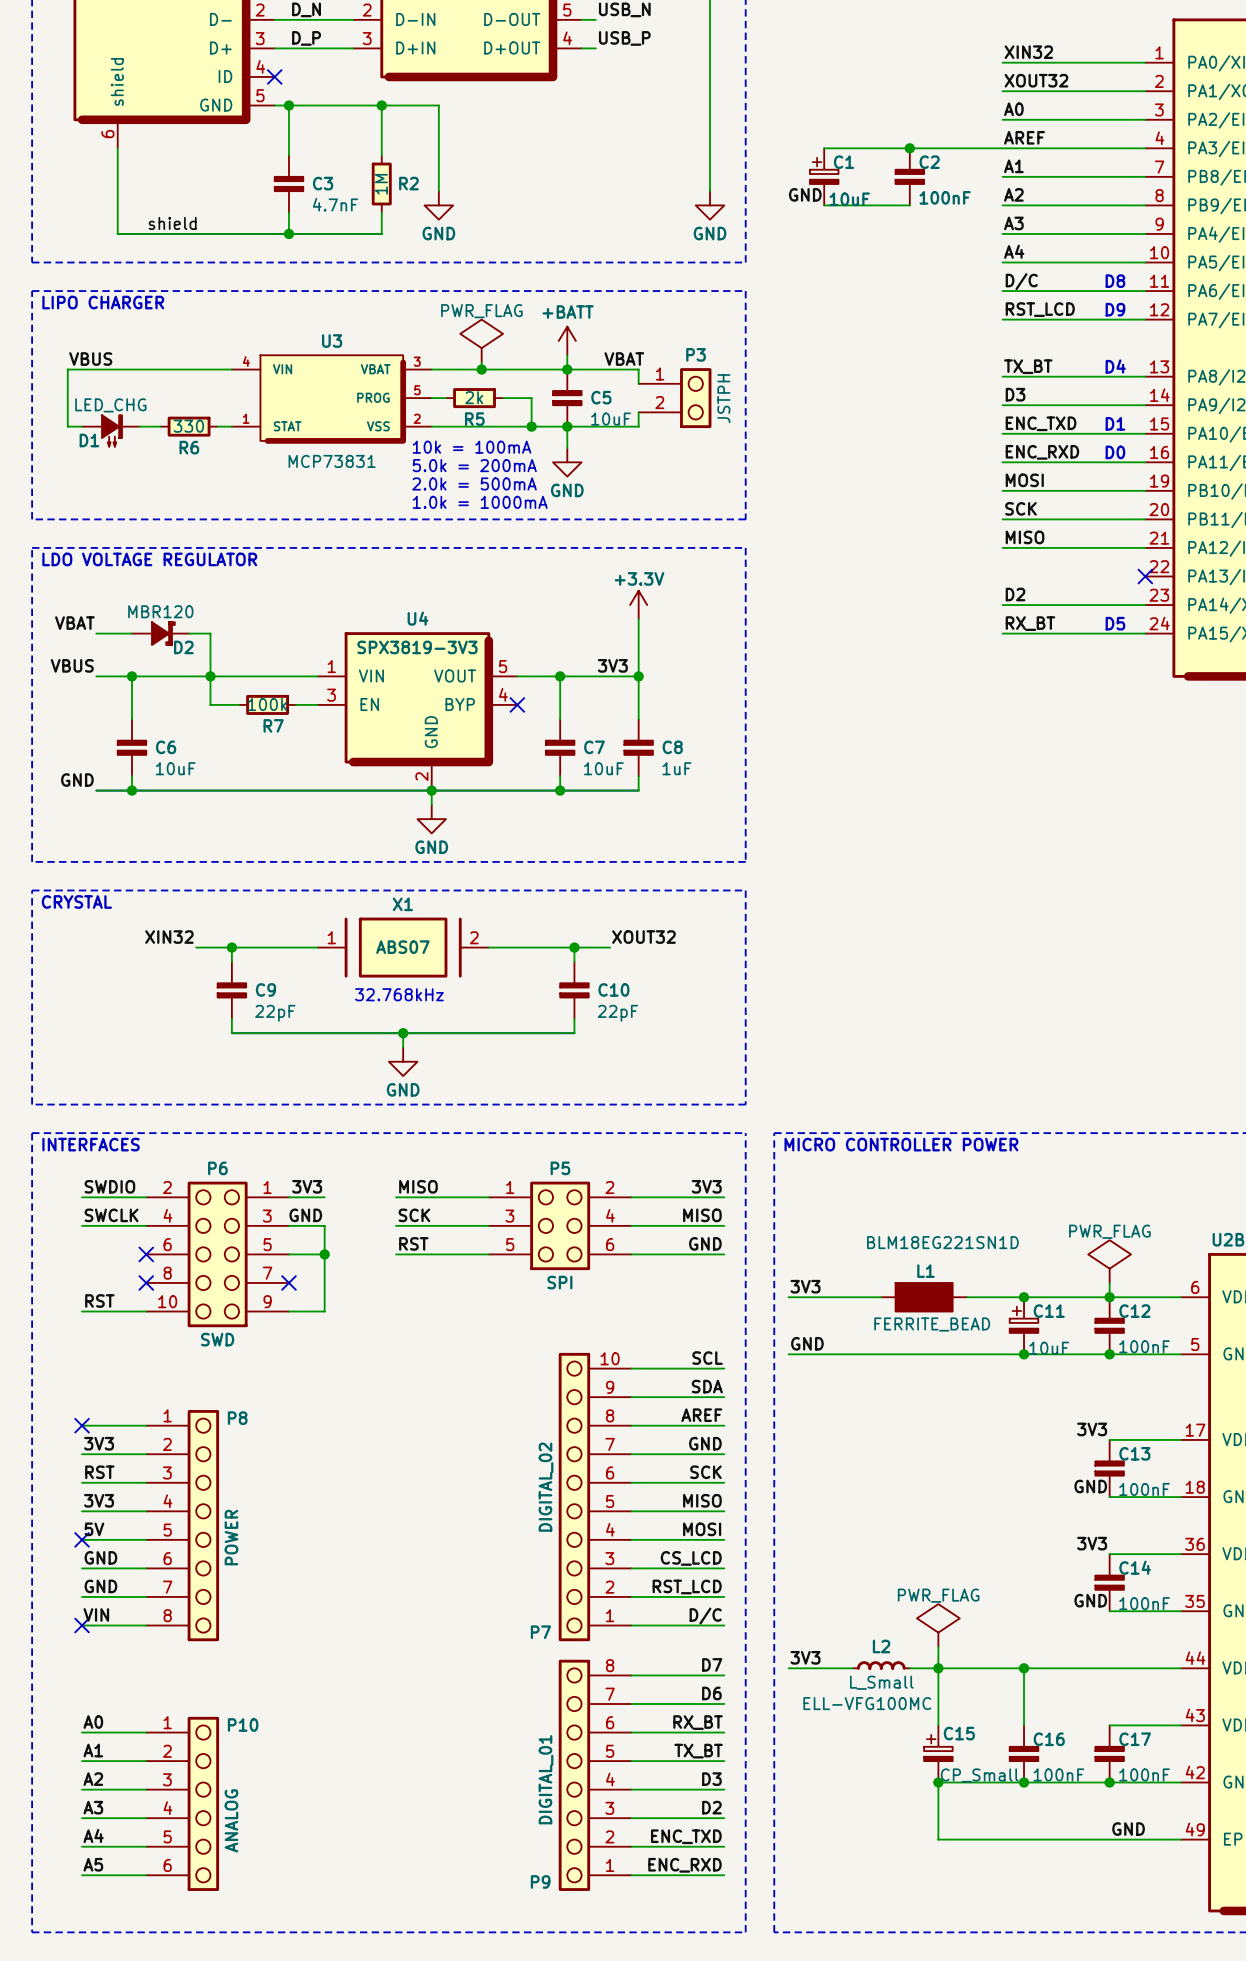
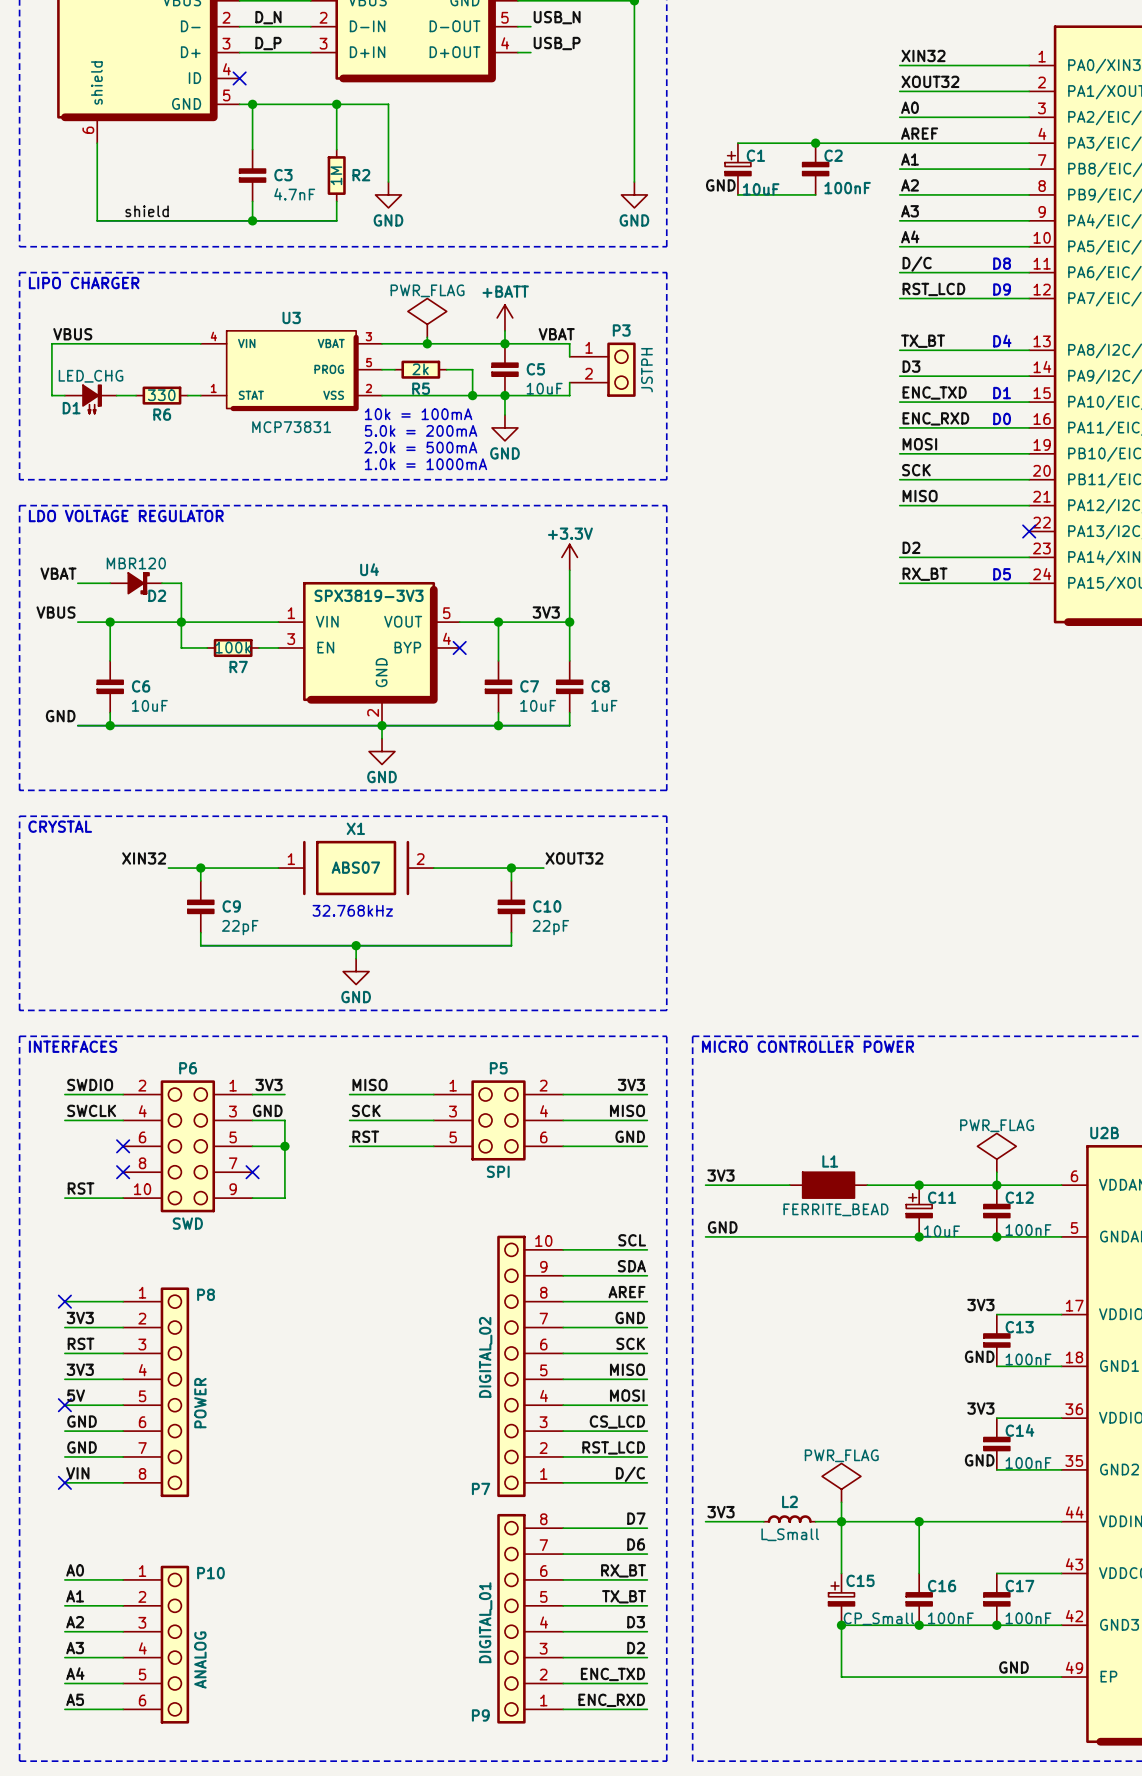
L1 text: BLM18EG221SN1D (942, 1242) -> none
L2 text: ELL-VFG100MC (867, 1703) -> none

